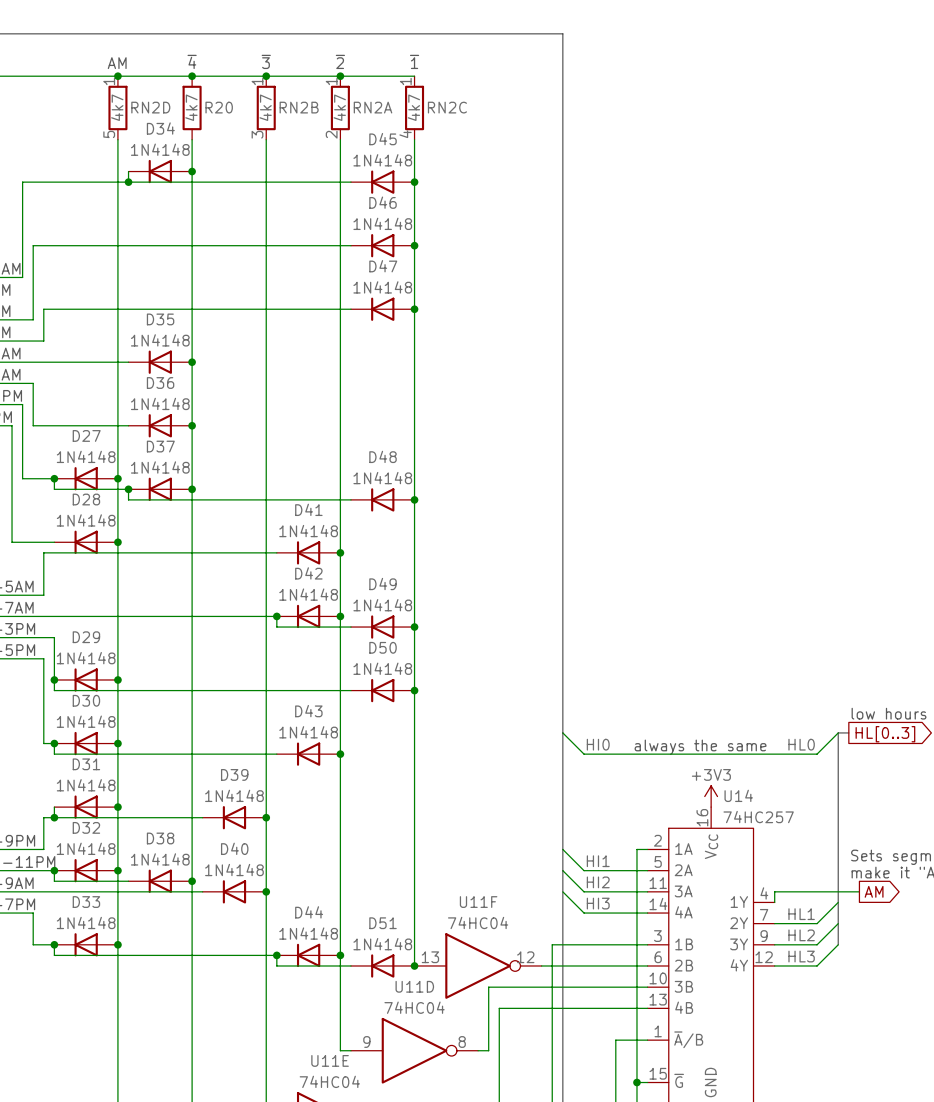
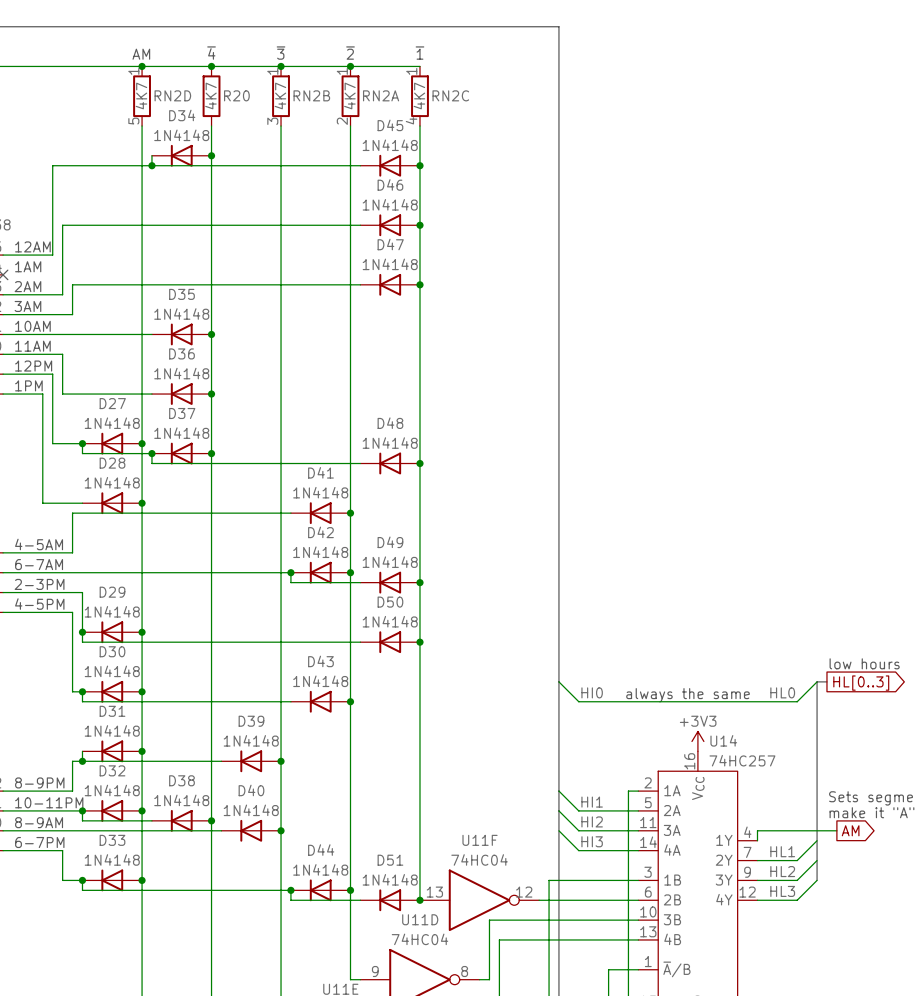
RN2D value: 4k7 (117, 107) -> 4K7 (141, 95)
R20 value: 4k7 (191, 107) -> 4K7 (210, 95)
RN2B value: 4k7 (265, 107) -> 4K7 (280, 95)
RN2A value: 4k7 (339, 107) -> 4K7 (349, 95)
RN2C value: 4k7 (413, 107) -> 4K7 (419, 95)

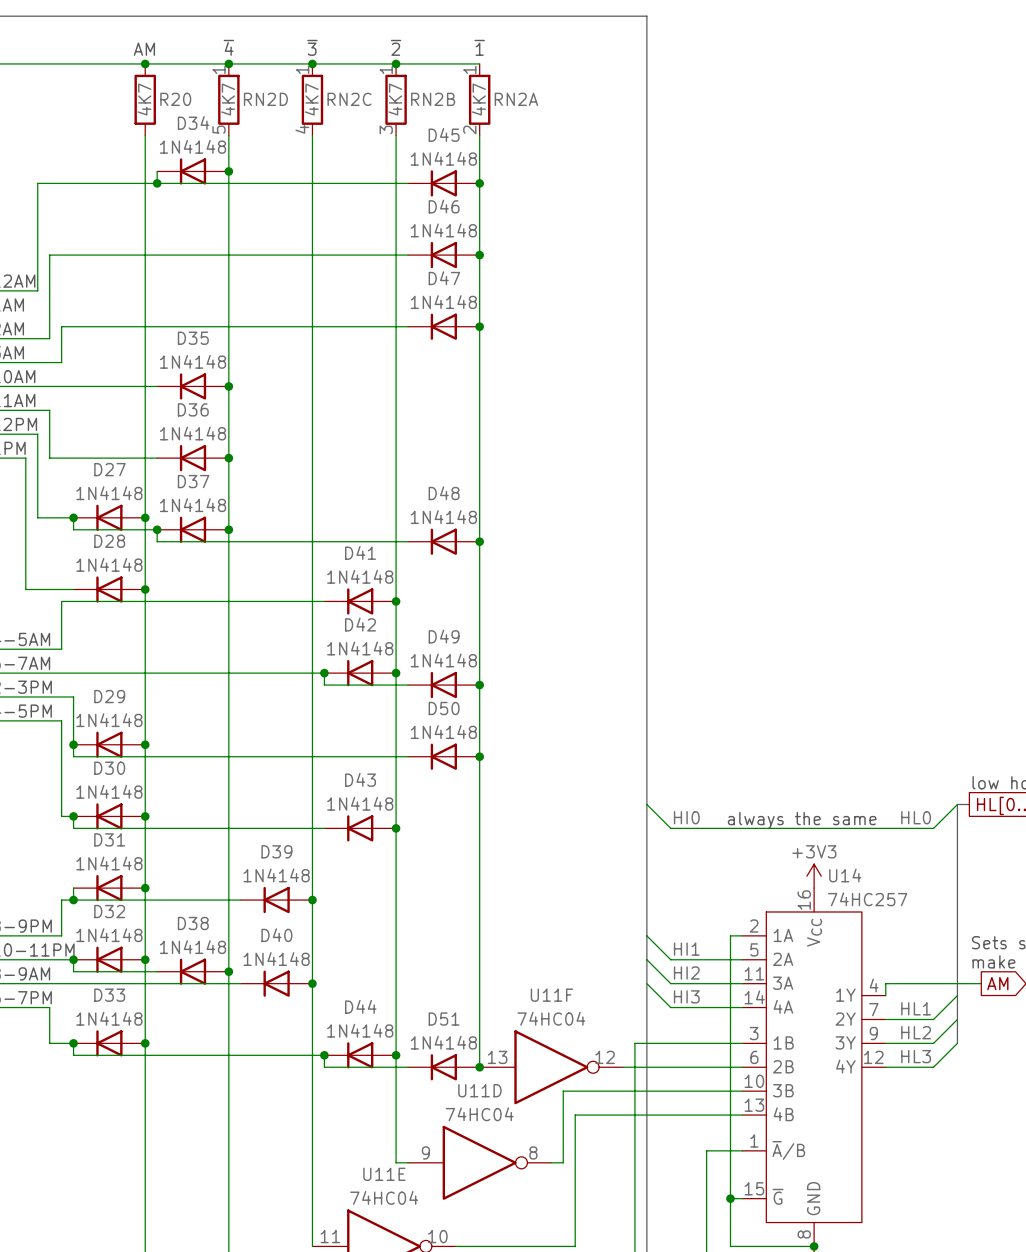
RN2D position: (142, 96) -> (228, 99)
R20 position: (211, 96) -> (145, 99)
RN2B position: (281, 96) -> (396, 99)
RN2A position: (350, 96) -> (479, 99)
RN2C position: (419, 96) -> (312, 99)

